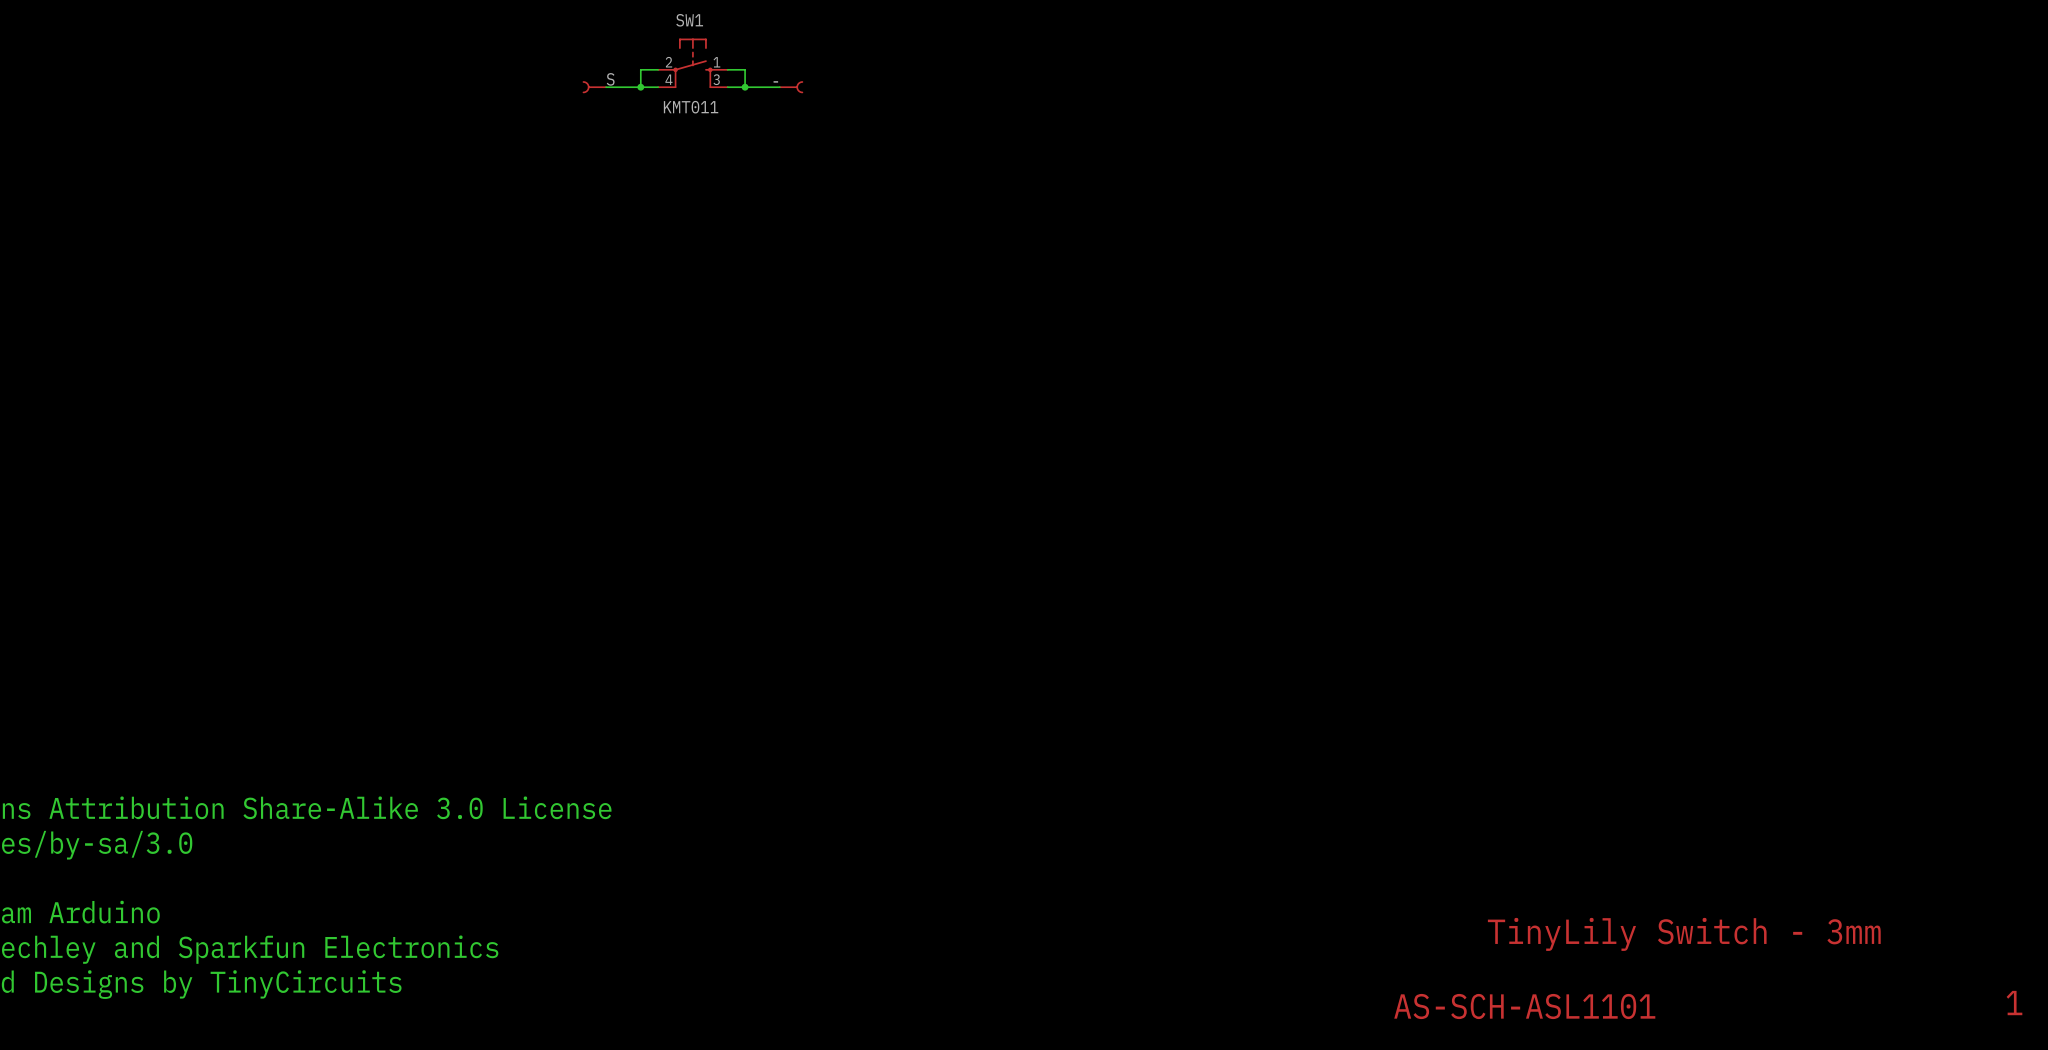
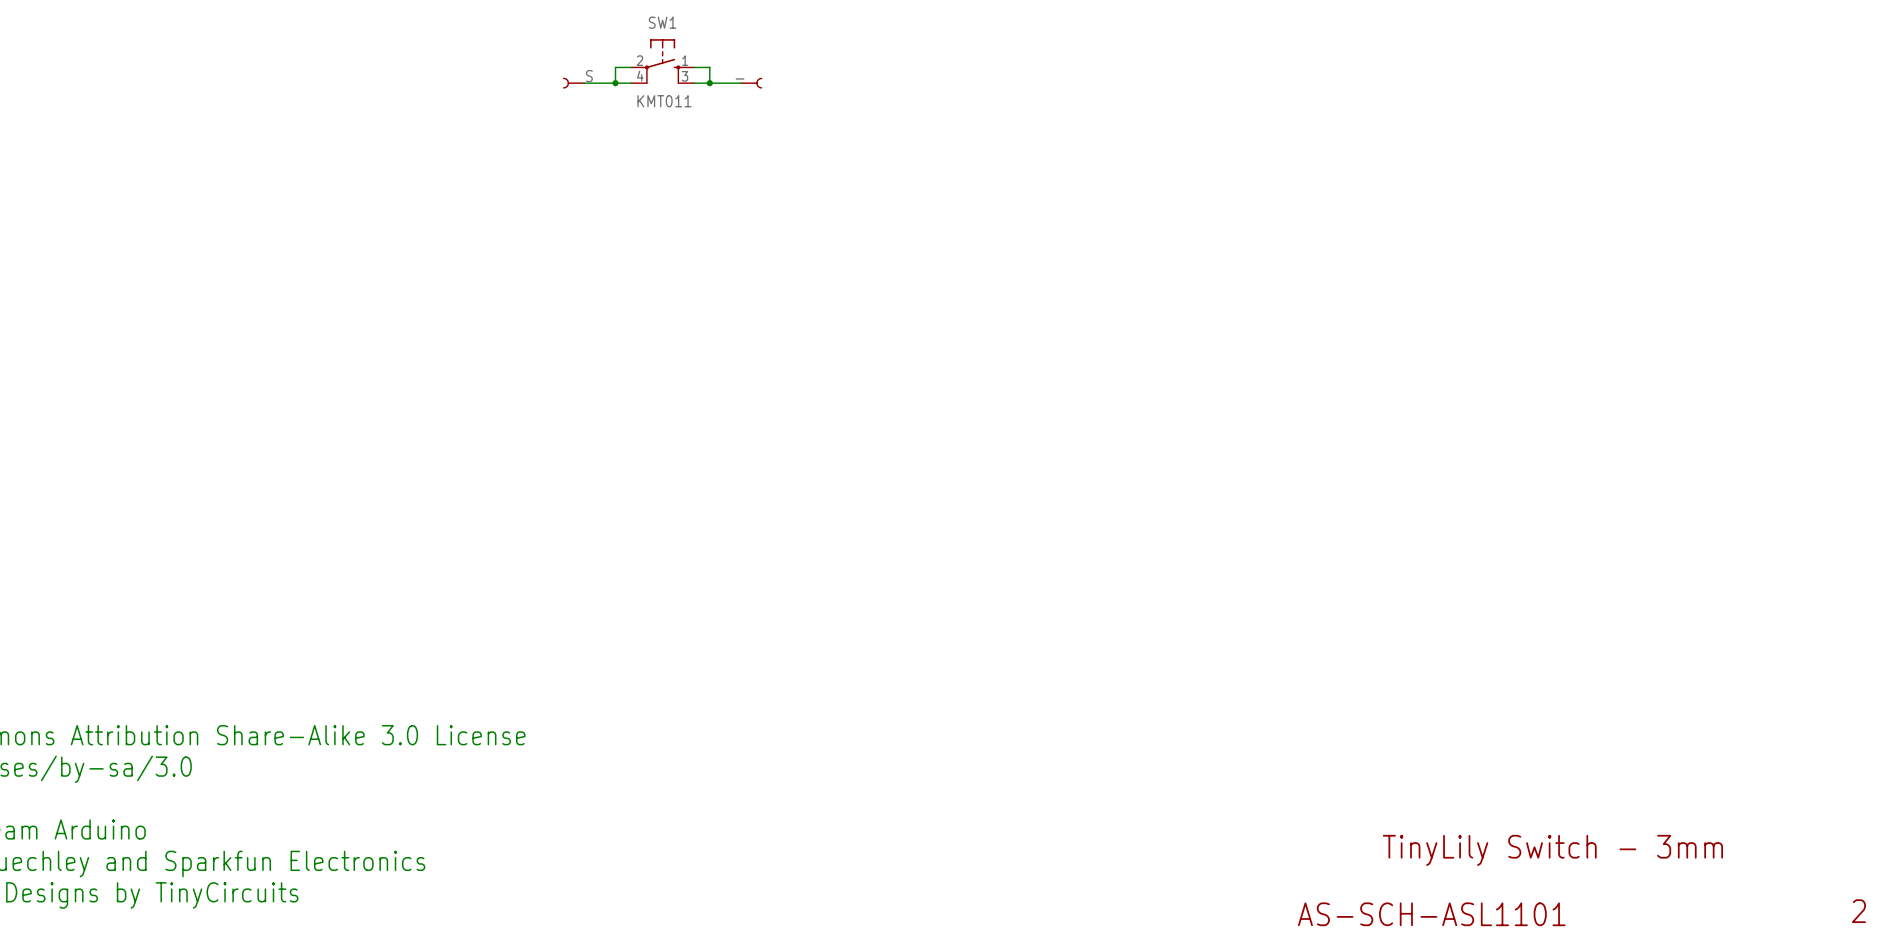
text: 1 (2014, 1003) -> 2 (1858, 911)

